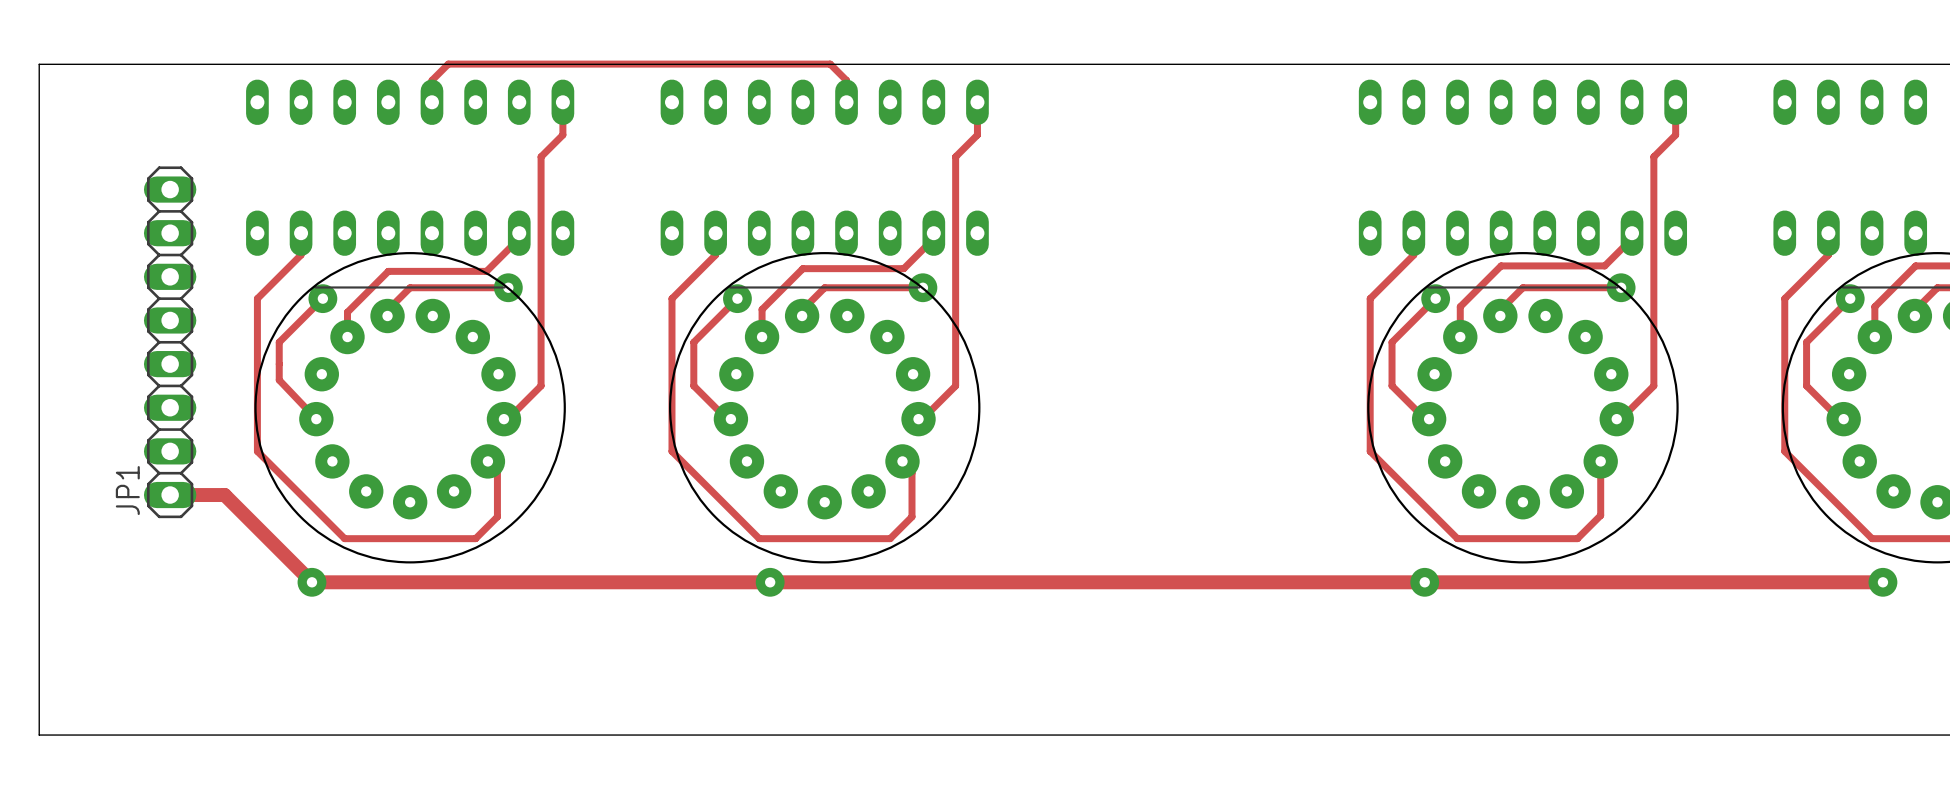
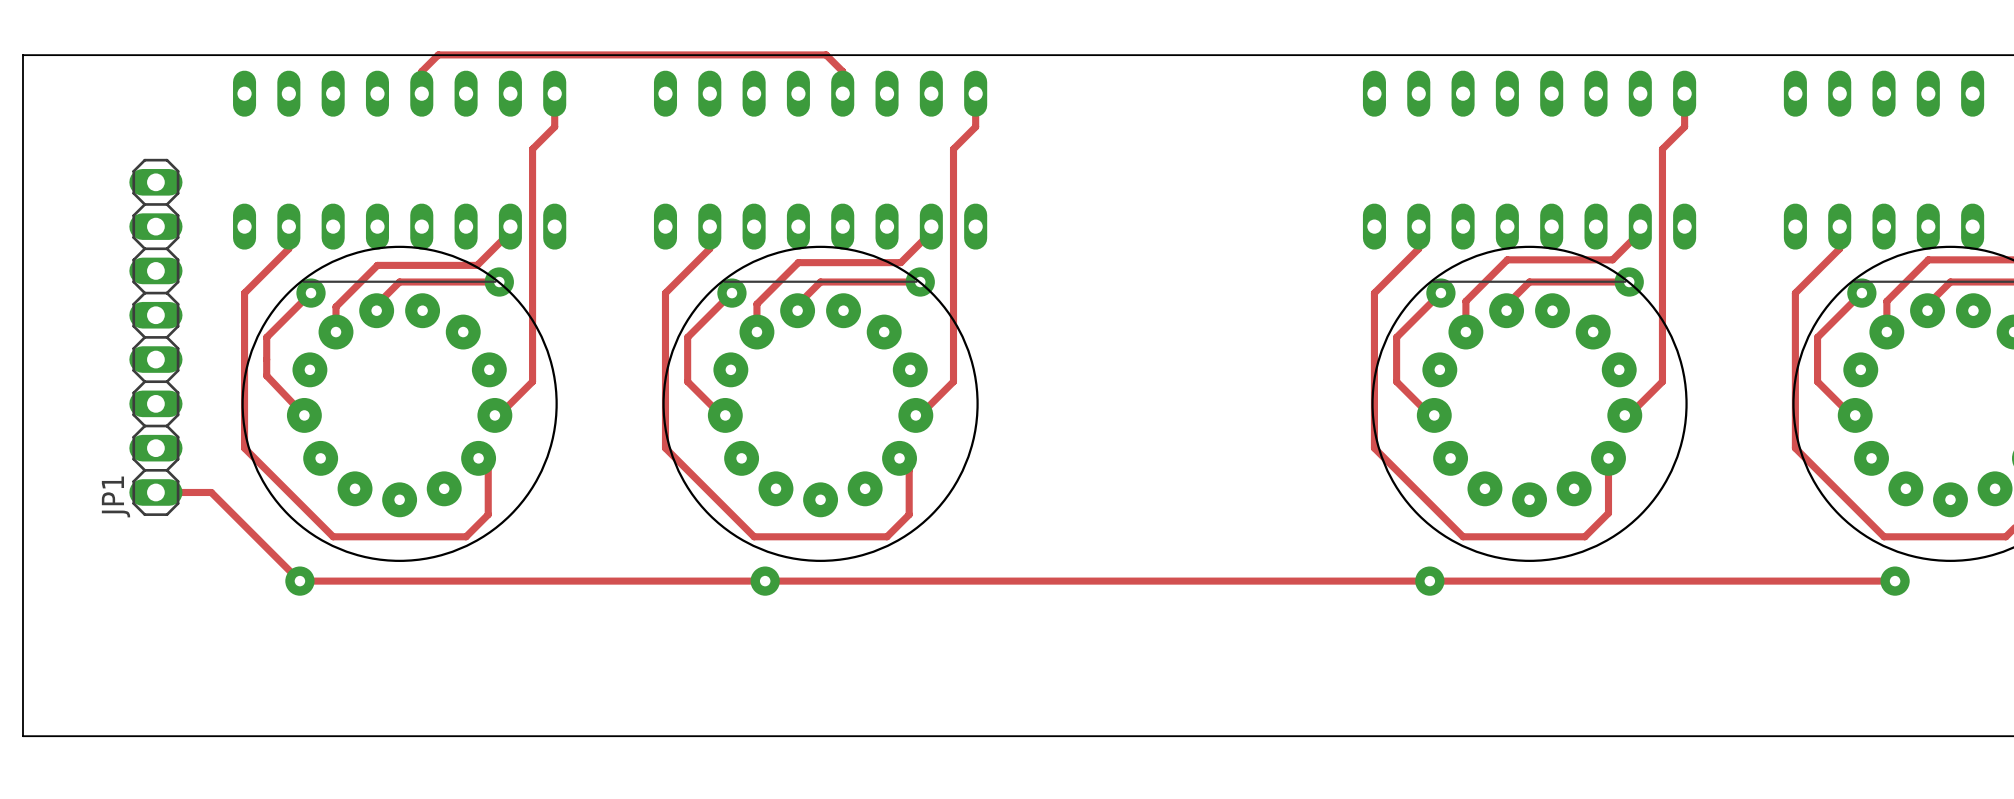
track width: thick (170, 495) (224, 495) (311, 582) (1882, 582) -> thin (155, 492) (211, 492) (299, 581) (1895, 581)

